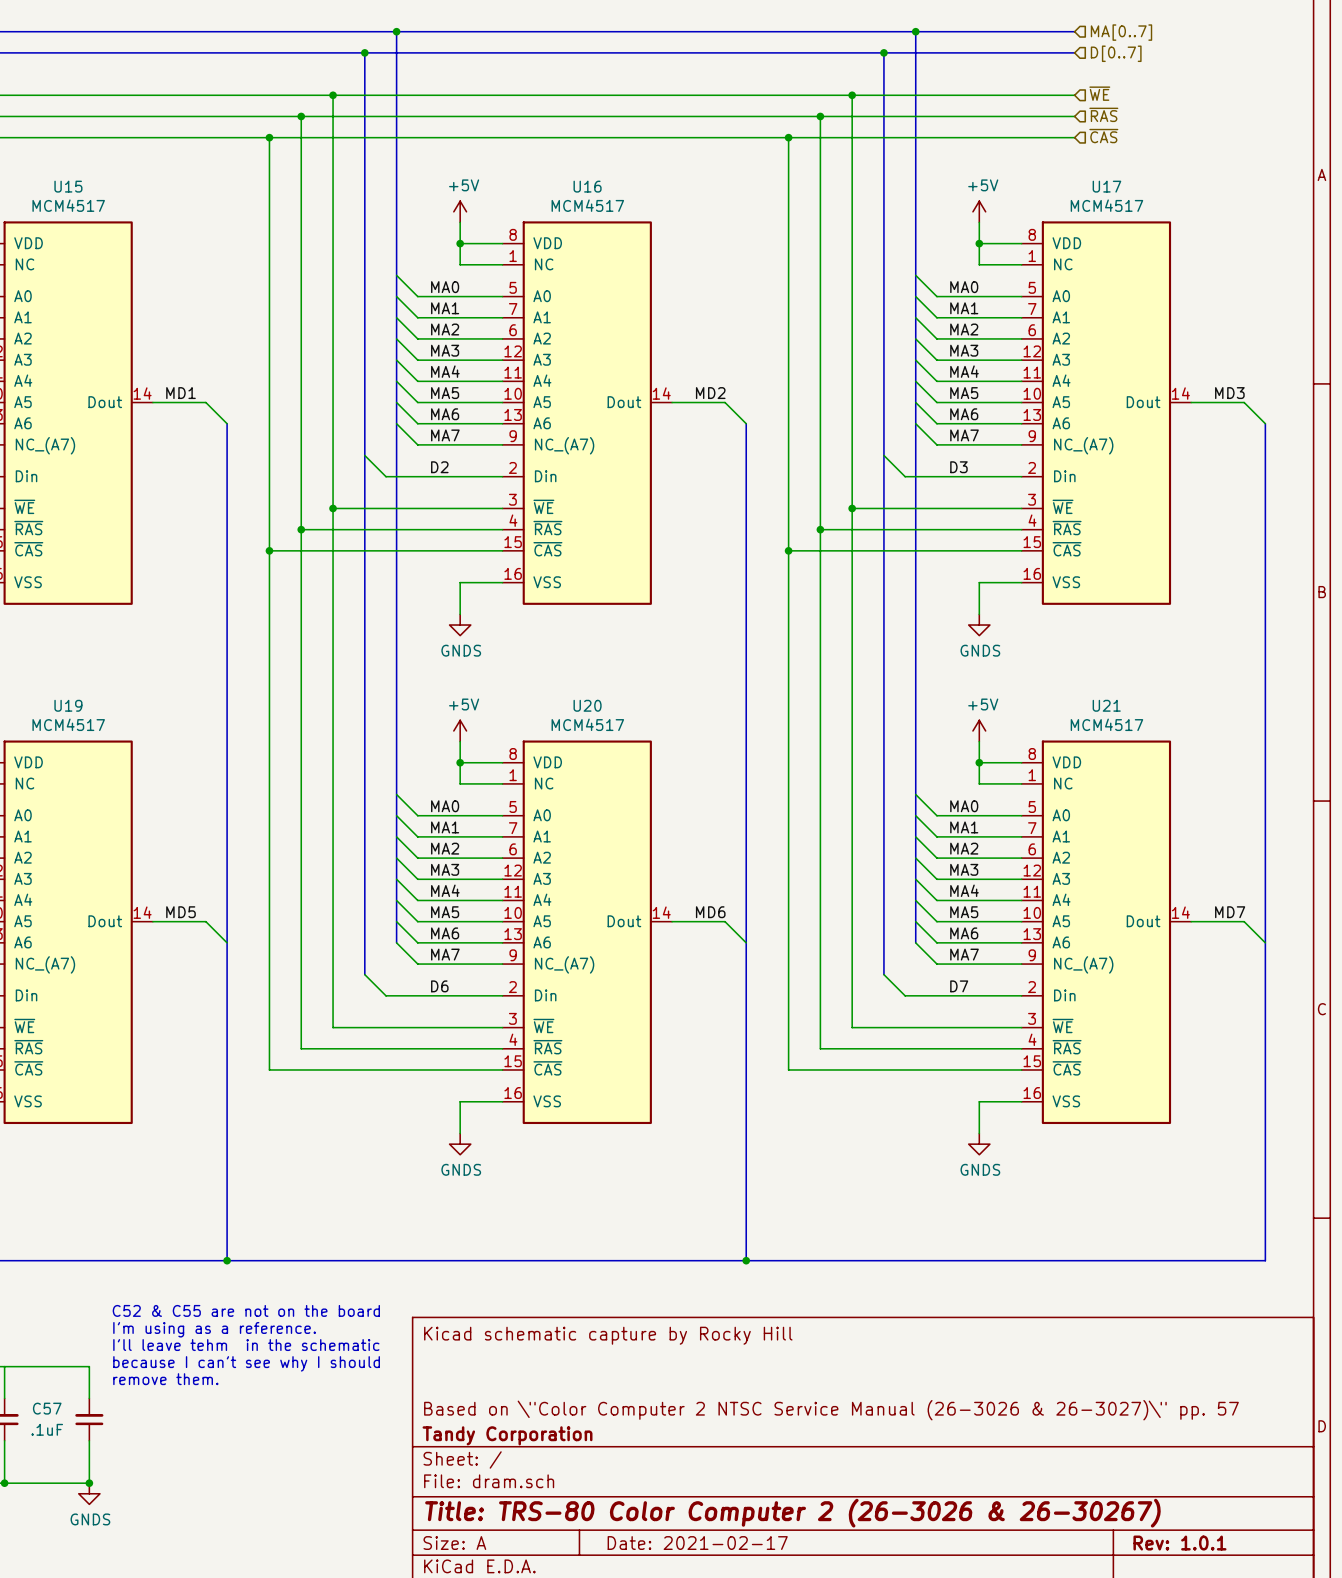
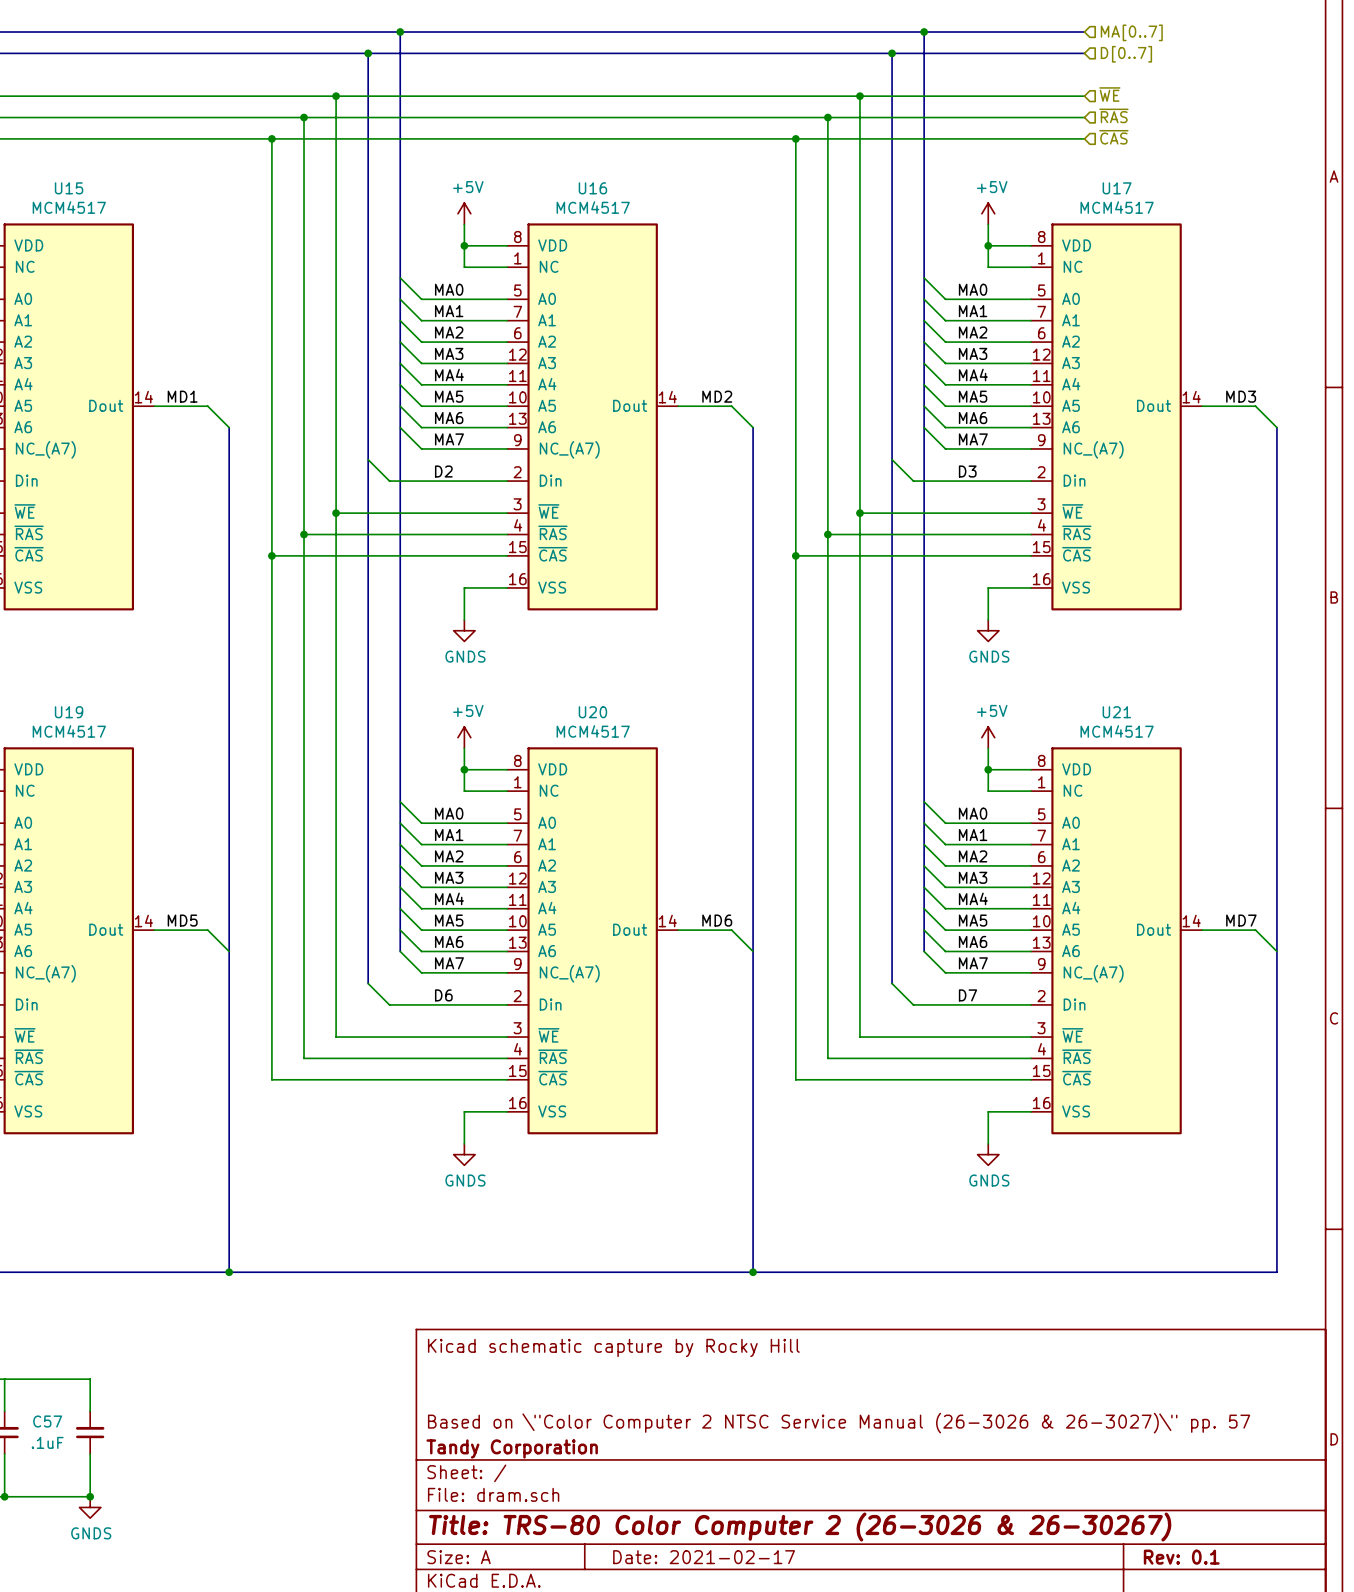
text: C52 & C55 are not on the board (246, 1310) -> none
text: I'm using as a reference. (214, 1329) -> none
text: I'll leave tehm in the schematic (246, 1345) -> none
text: because I can't see why I should (246, 1363) -> none
text: remove them. (165, 1379) -> none
title block: Rev: 1.0.1 (1179, 1543) -> Rev: 0.1 (1181, 1557)

